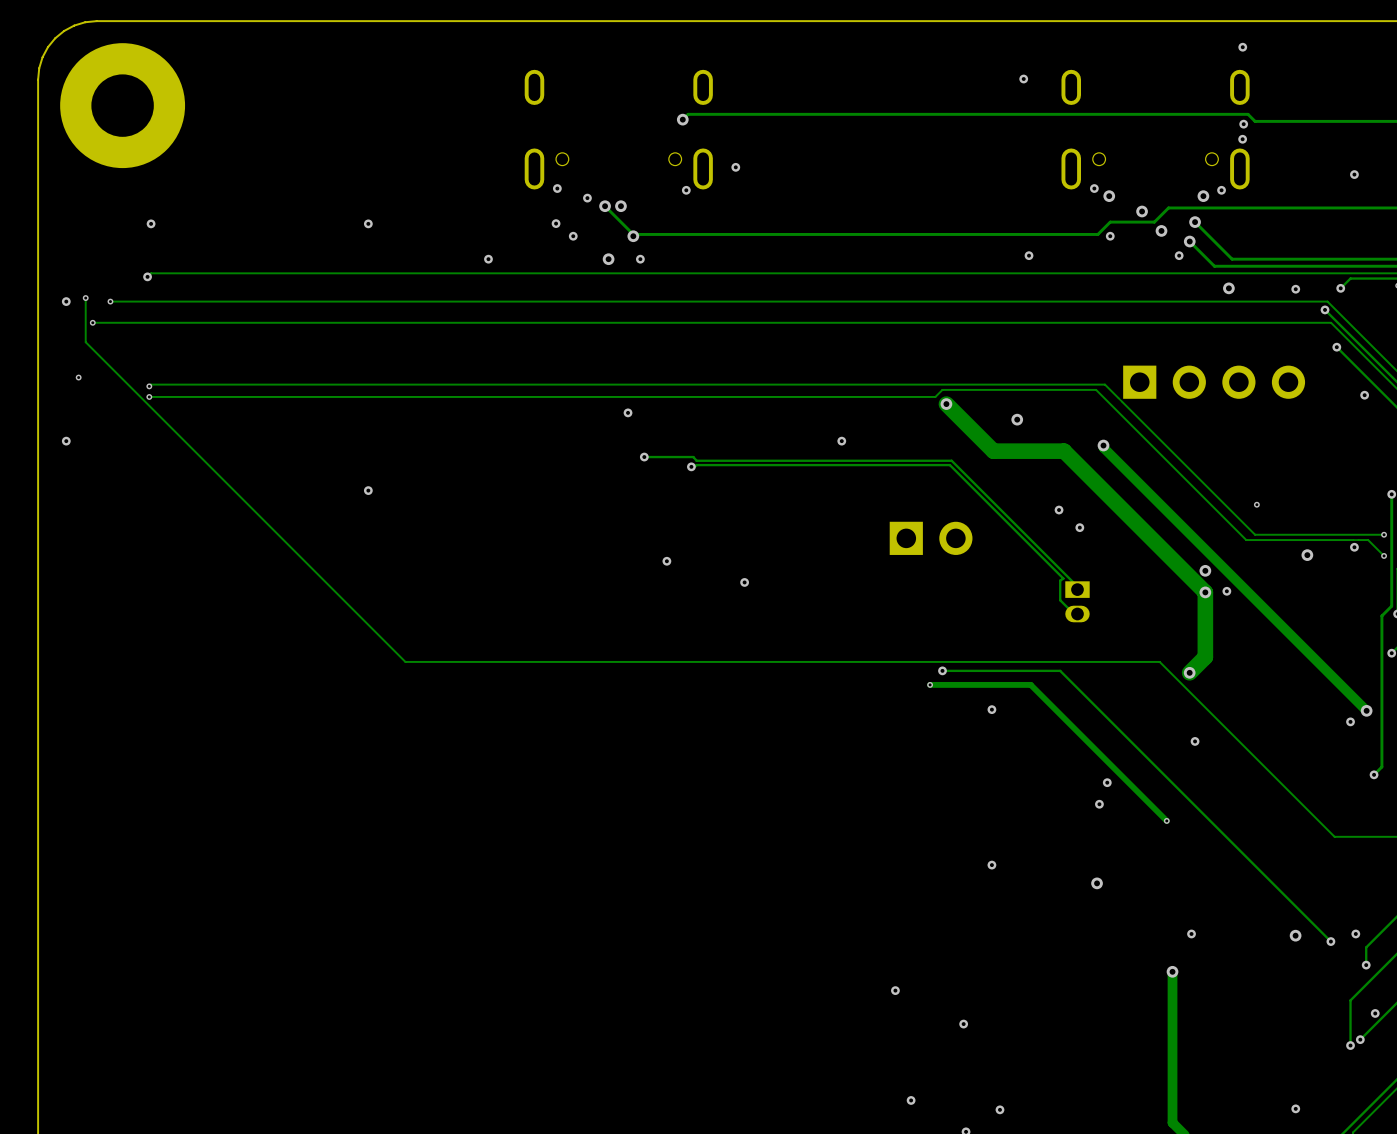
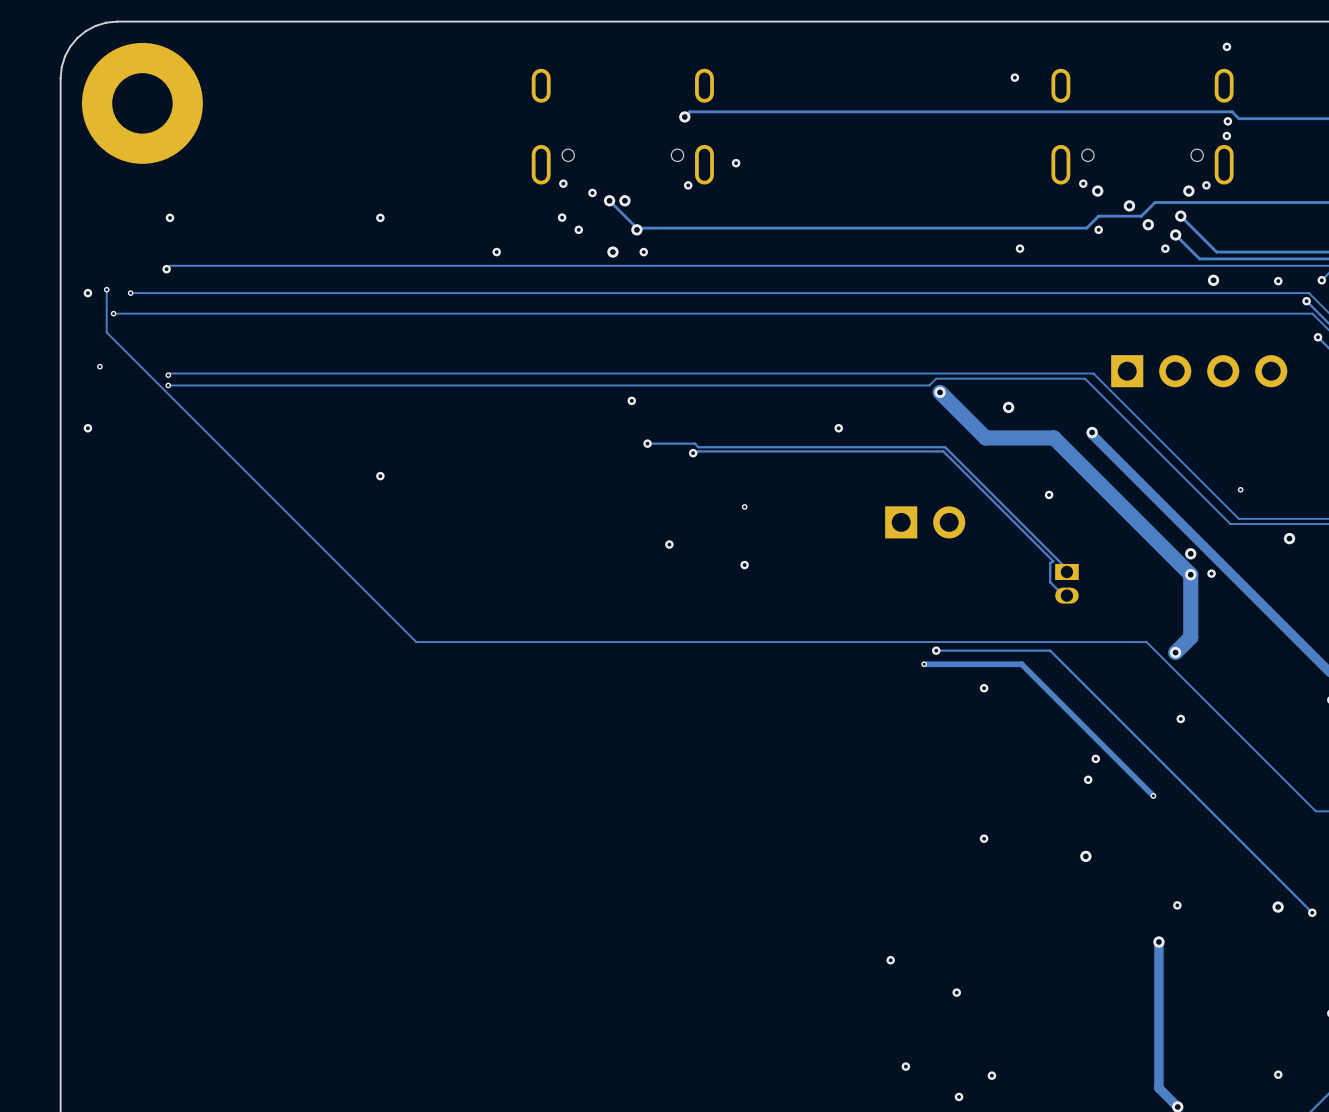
via: none -> (744, 506)
via: (1079, 527) -> none

